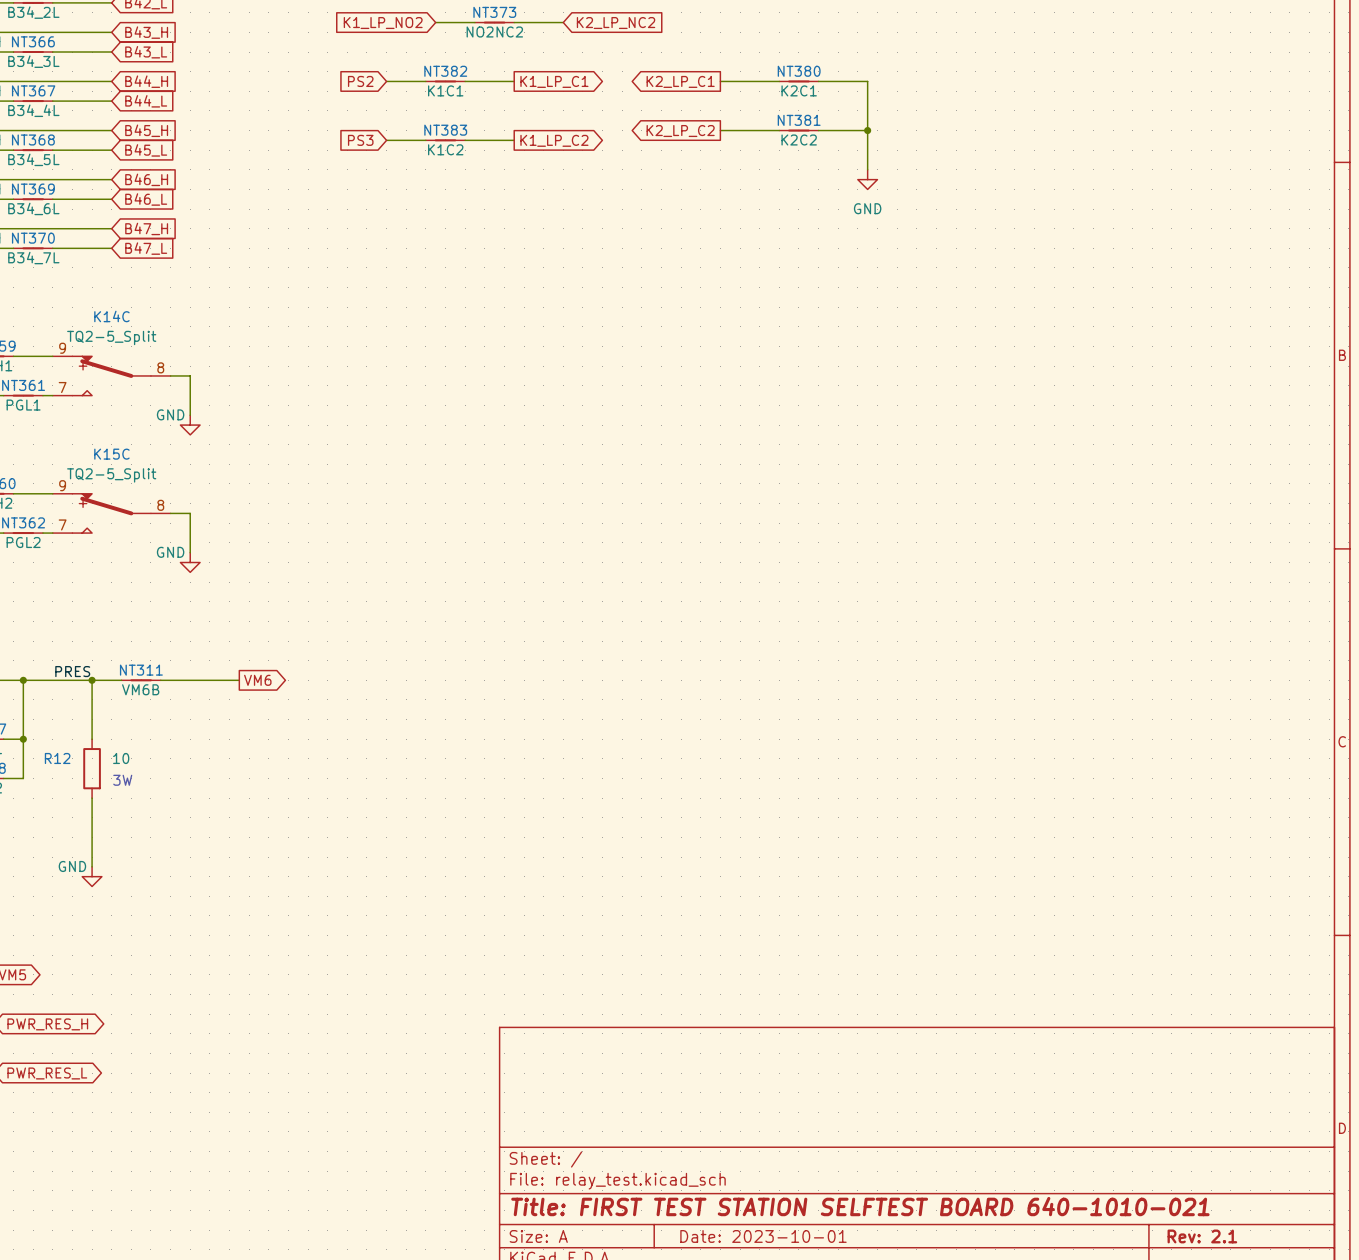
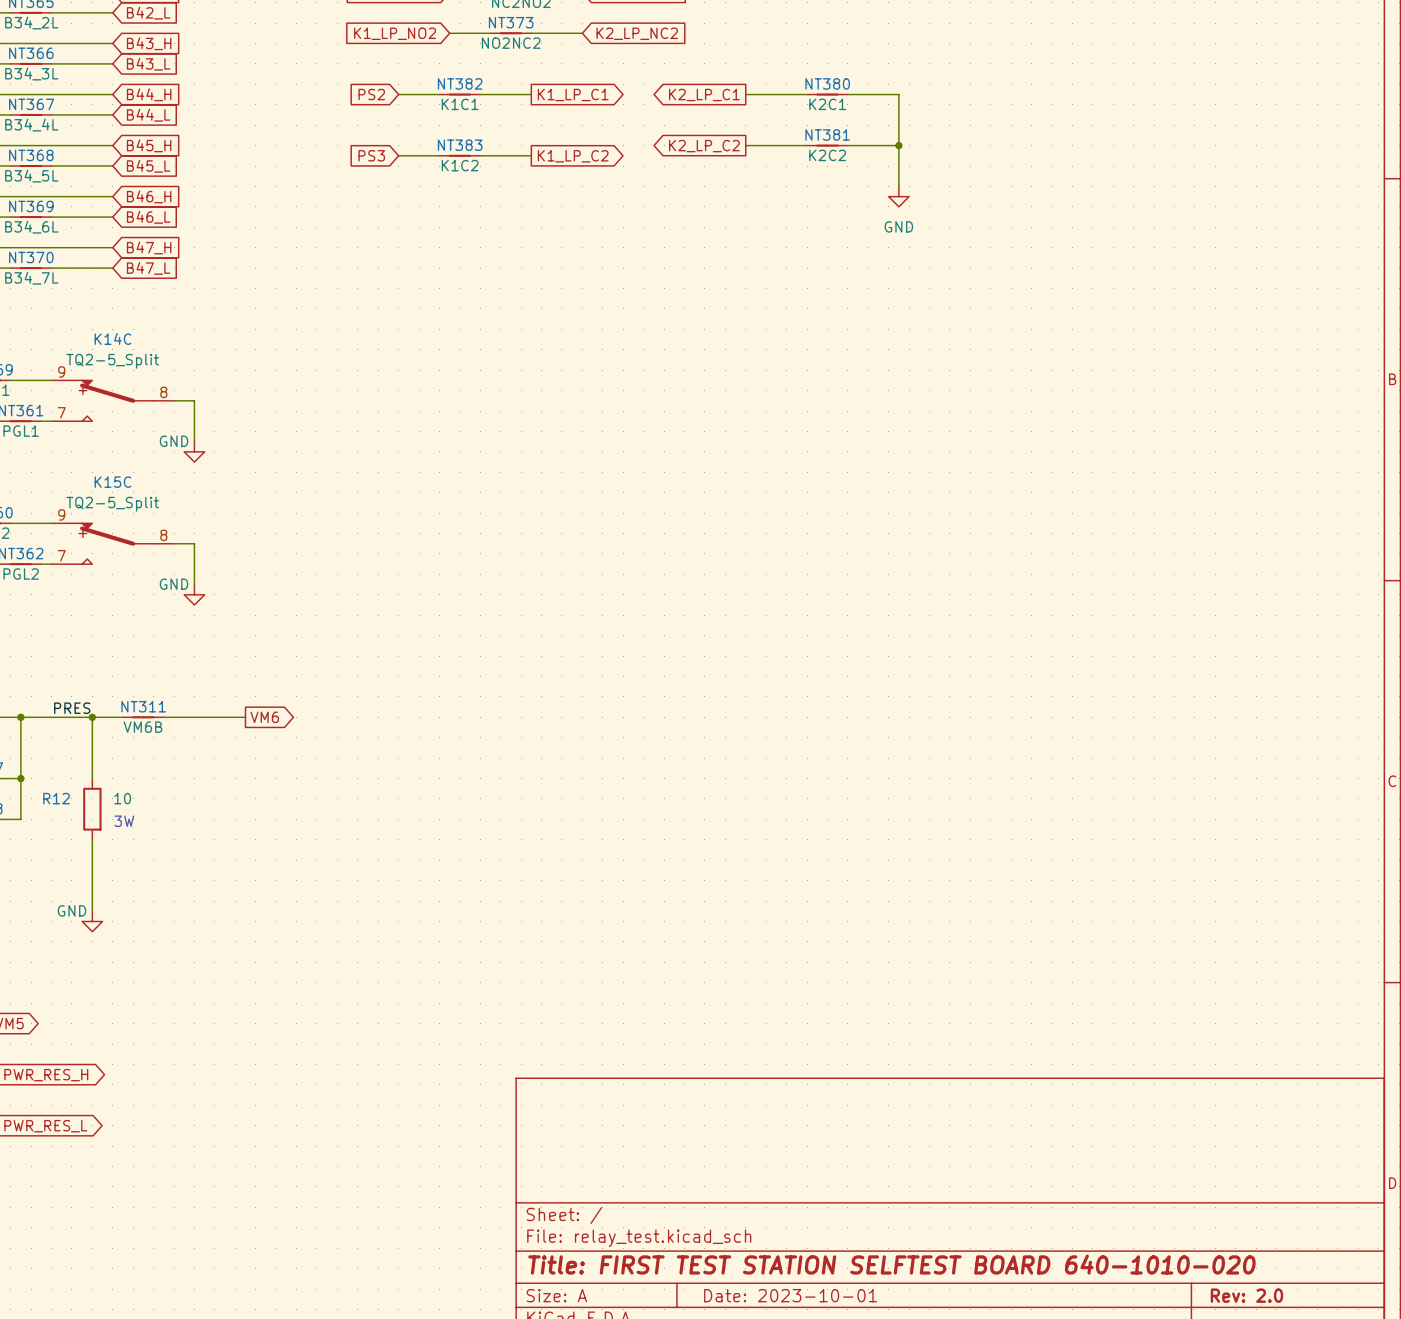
title block: Title: FIRST TEST STATION SELFTEST BOARD 640-1010-021 (860, 1206) -> Title: FIRST TEST STATION SELFTEST BOARD 640-1010-020 (891, 1264)
title block: Rev: 2.1 (1202, 1236) -> Rev: 2.0 (1246, 1295)

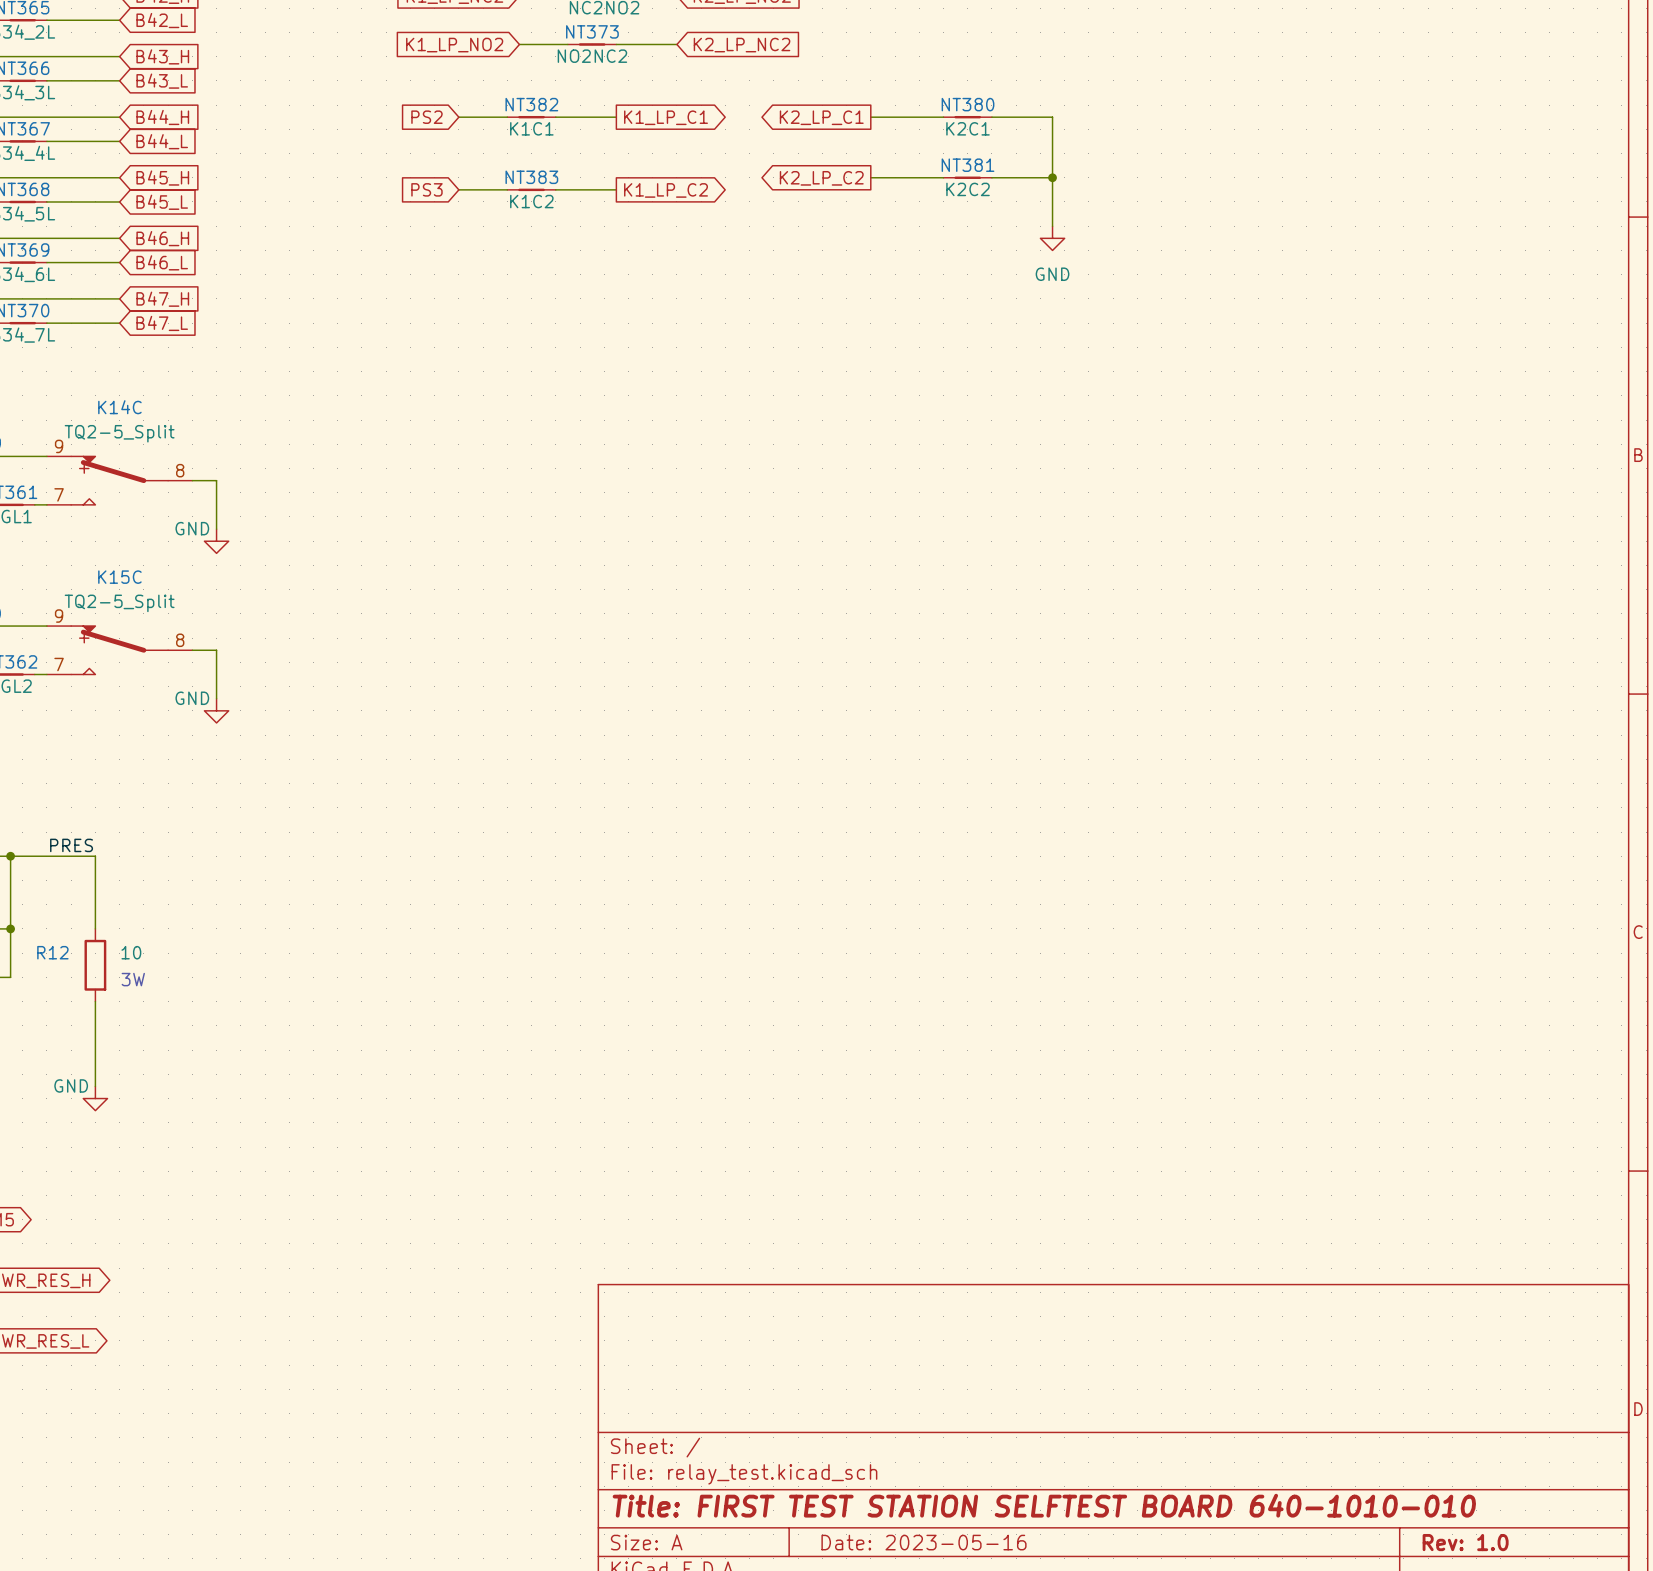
wire: (92, 717) (122, 717) -> none
junction: (92, 717) -> none
NT311: VM6B (143, 717) -> none
wire: (163, 717) (245, 717) -> none
global label: VM6 (264, 717) -> none
title block: Title: FIRST TEST STATION SELFTEST BOARD 640-1010-020 (891, 1264) -> Title: FIRST TEST STATION SELFTEST BOARD 640-1010-010 (1044, 1505)
title block: Date: 2023-10-01 (790, 1295) -> Date: 2023-05-16 (923, 1542)
title block: Rev: 2.0 (1246, 1295) -> Rev: 1.0 (1465, 1542)

